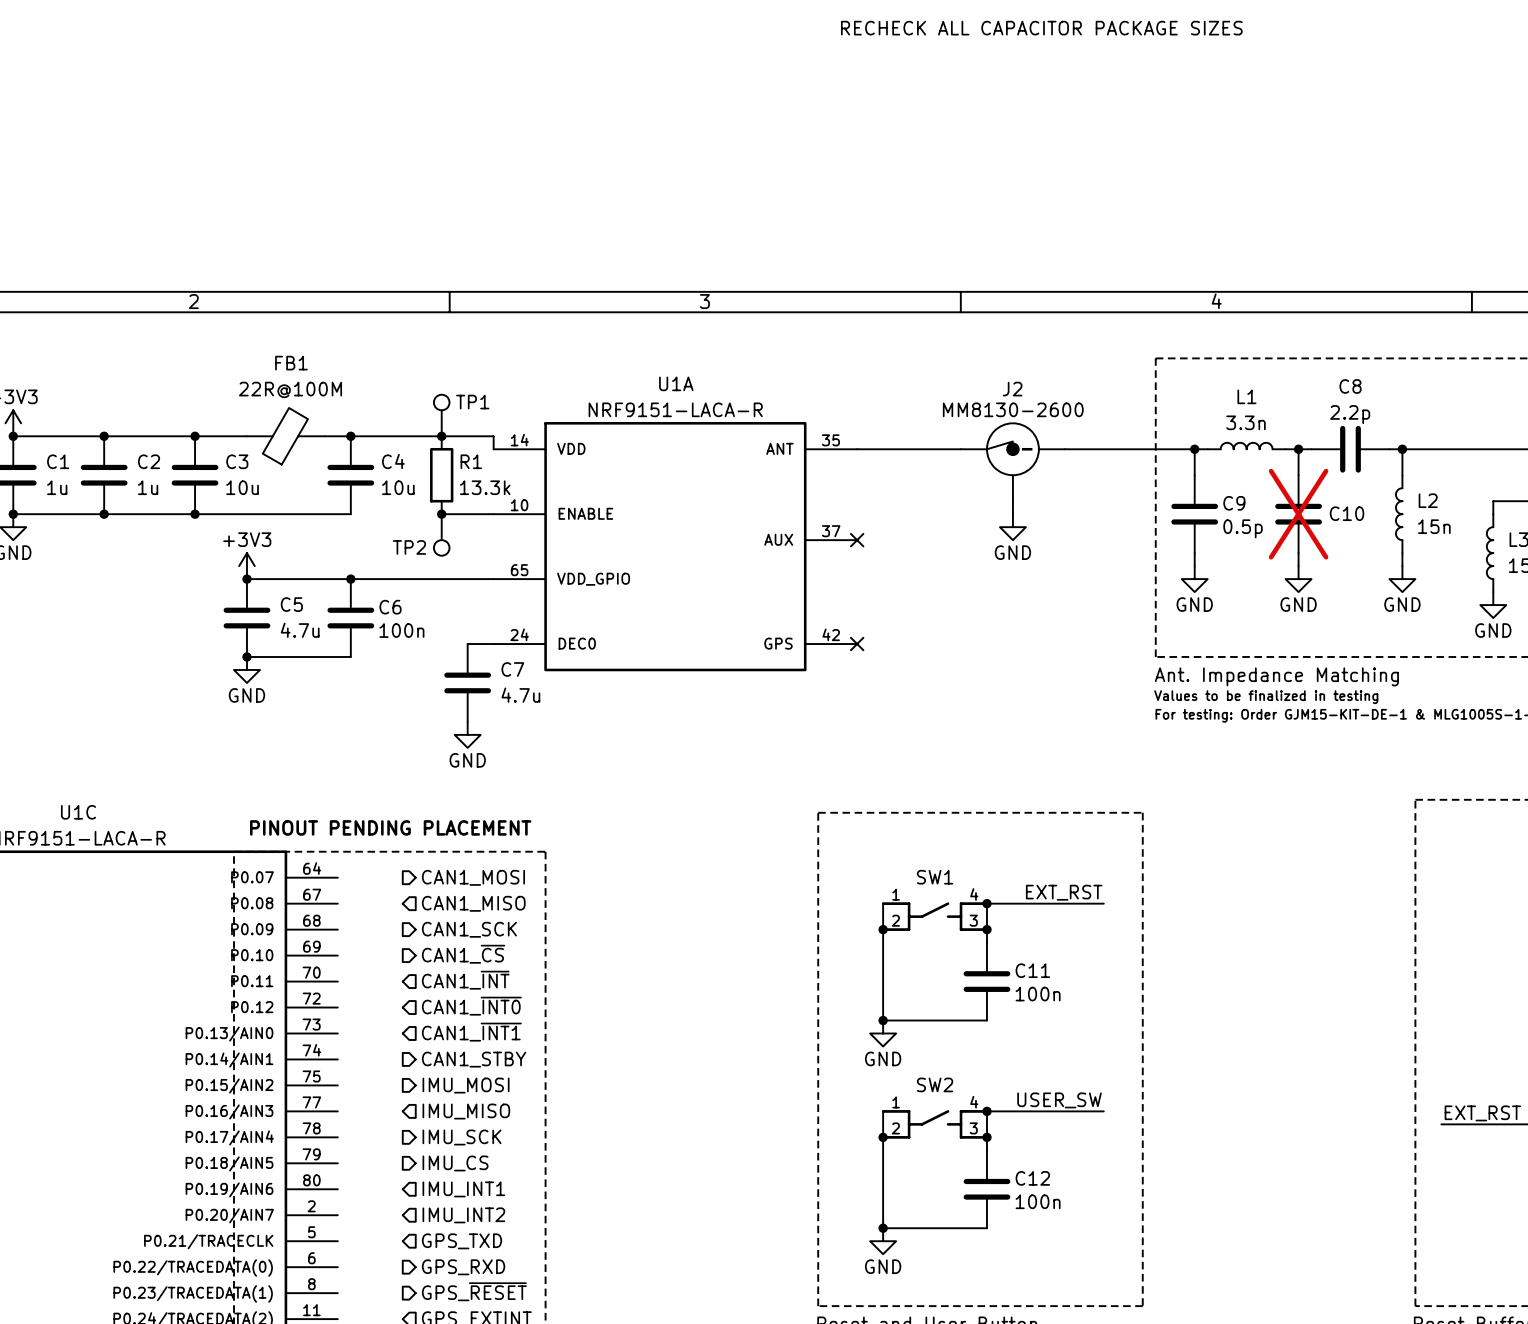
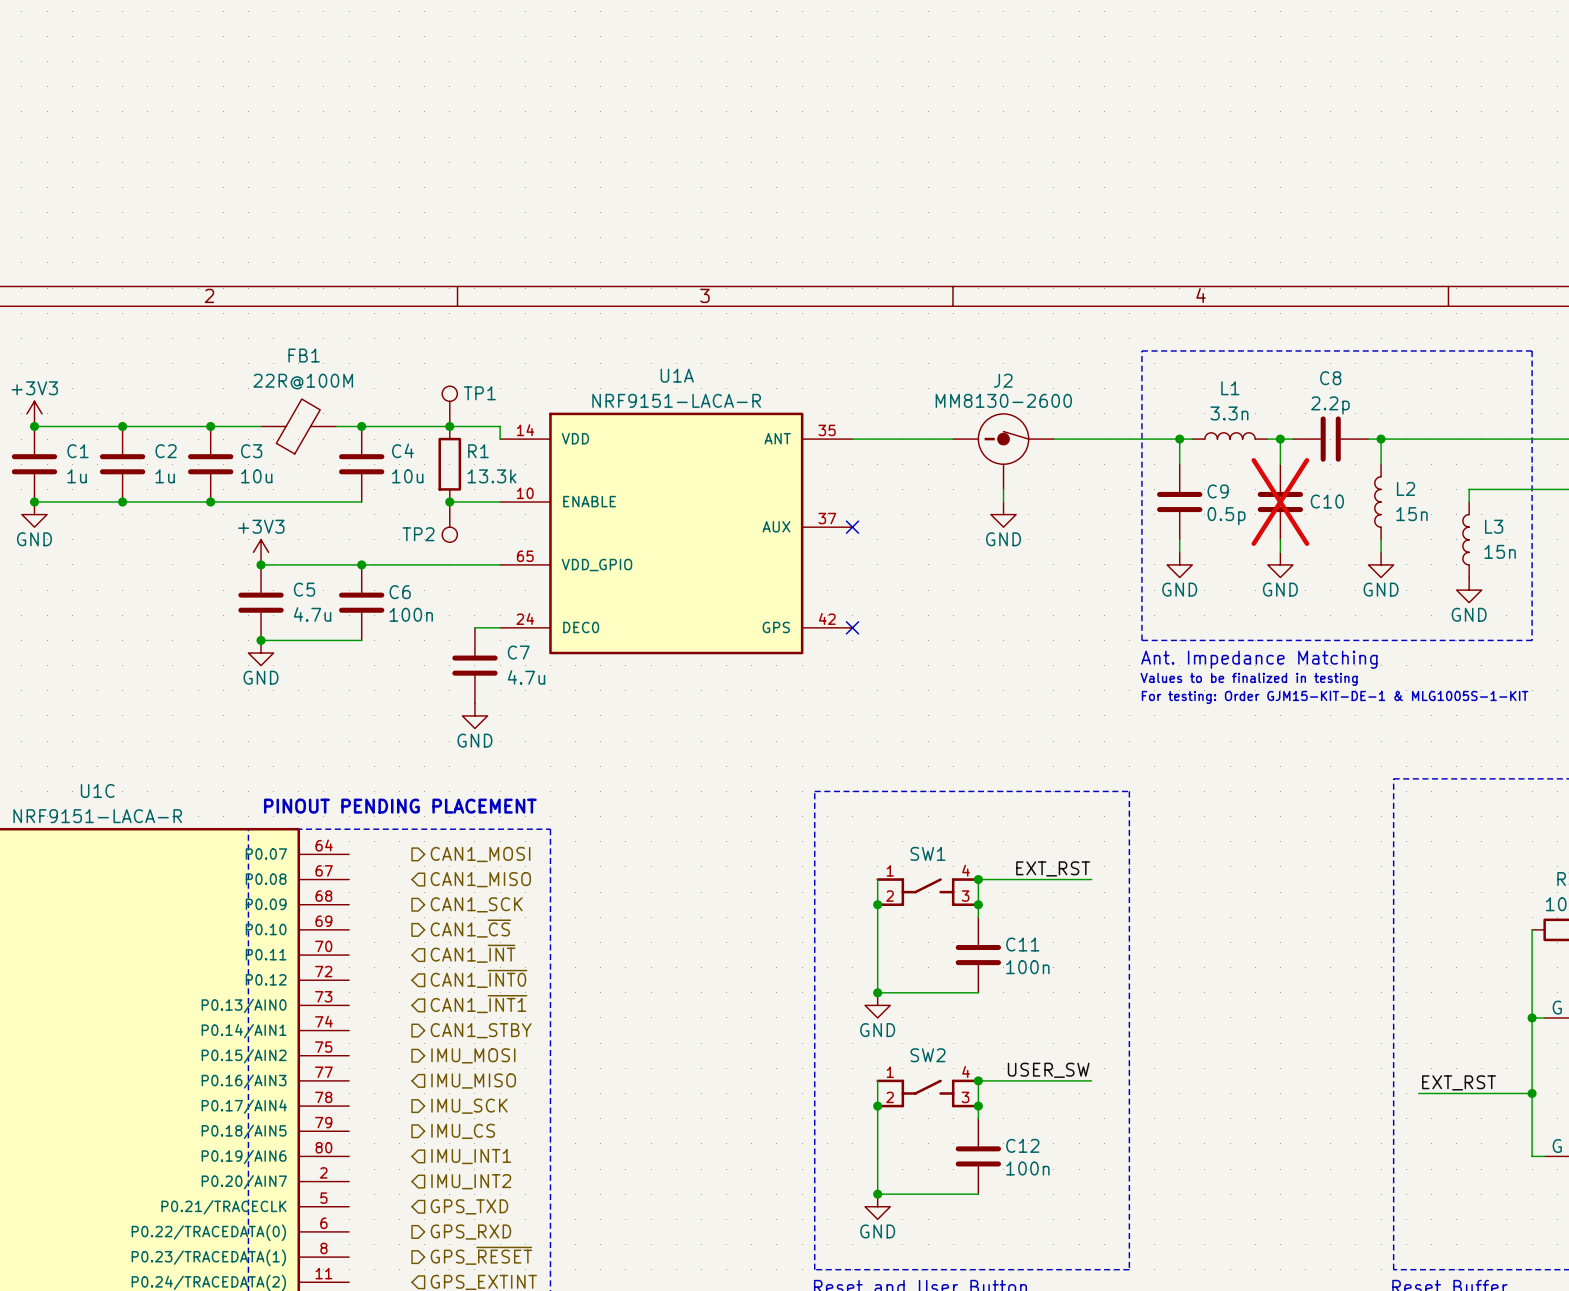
text: RECHECK ALL CAPACITOR PACKAGE SIZES (1041, 28) -> none
J2 flip: as is (1013, 449) -> left-right (1002, 439)

